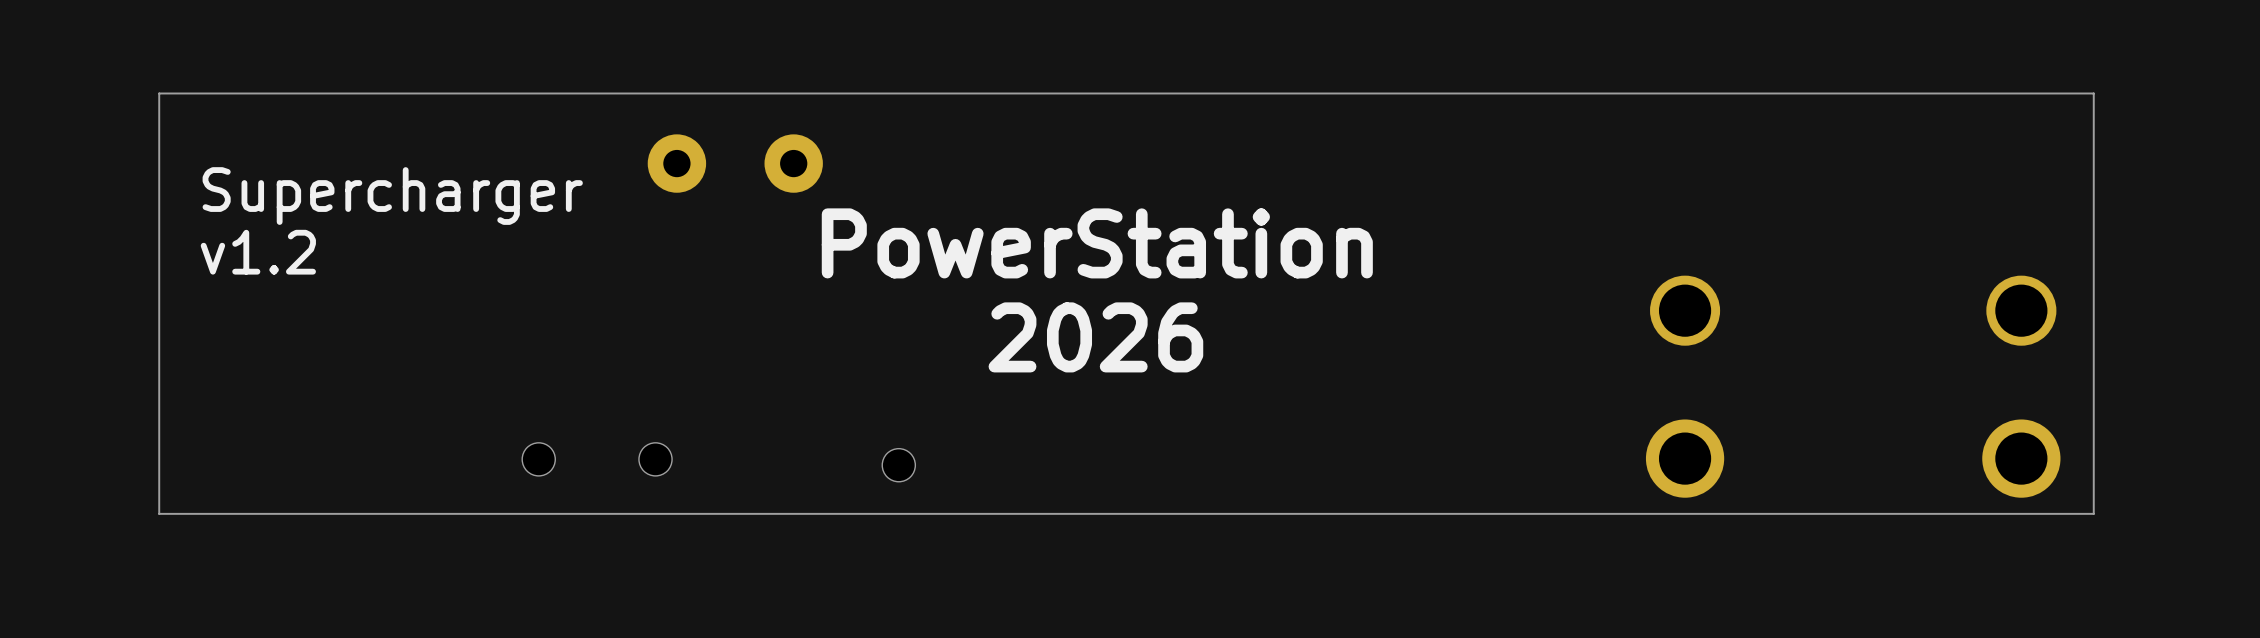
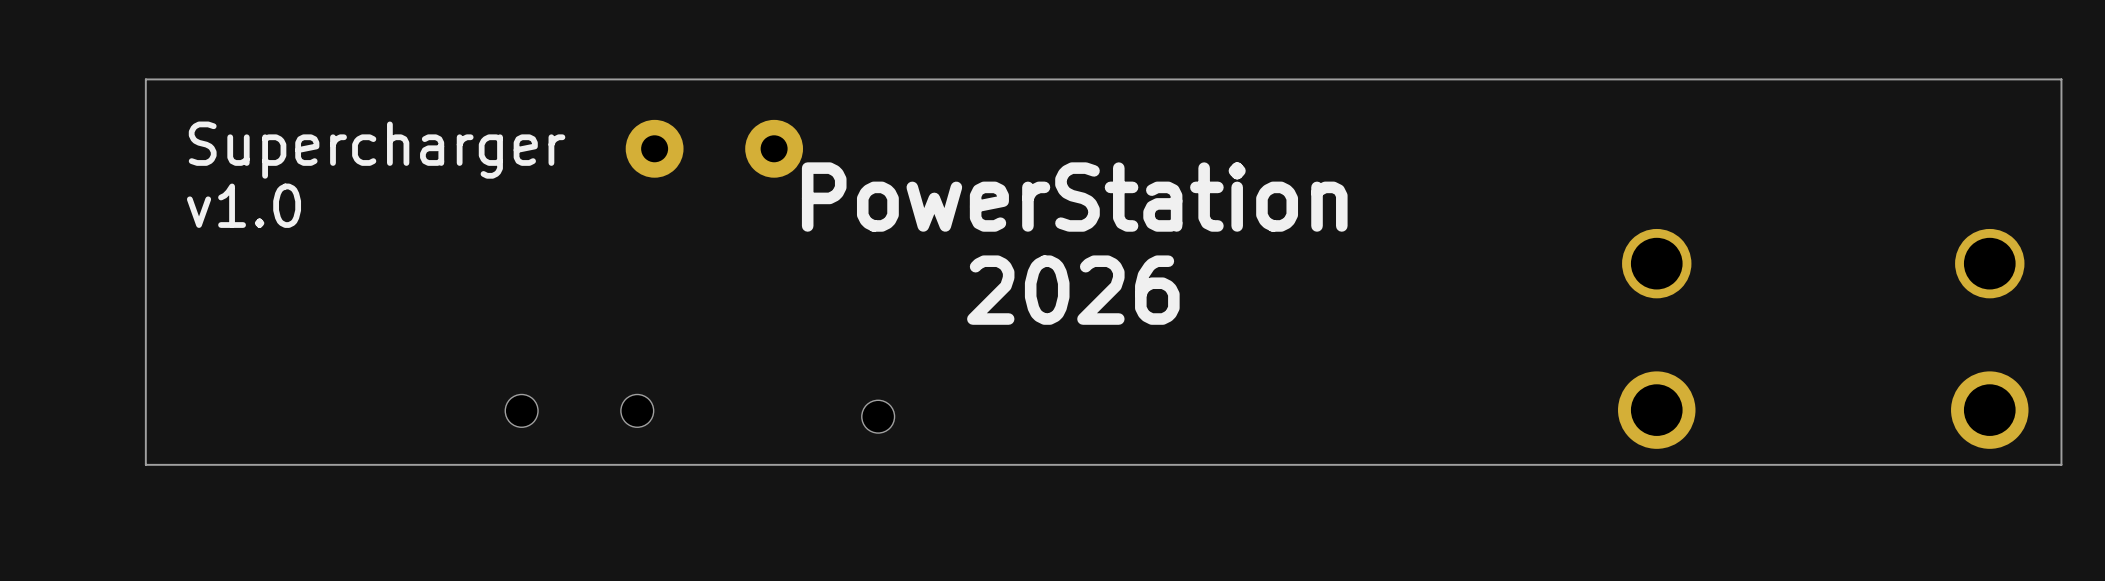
board edge: (2093, 124) (2093, 93) (159, 93) (159, 124) -> (2061, 79) (145, 79)
part position: (676, 163) -> (654, 148)
part position: (793, 163) -> (774, 148)
text: v1.2 (258, 252) -> v1.0 (243, 205)

